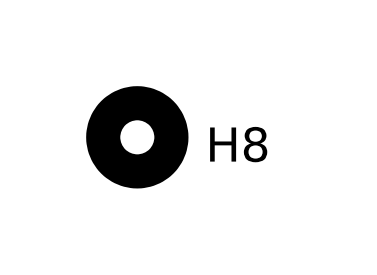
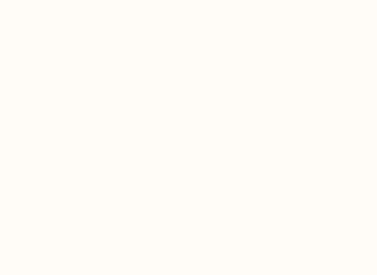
H8: (137, 137) -> none

